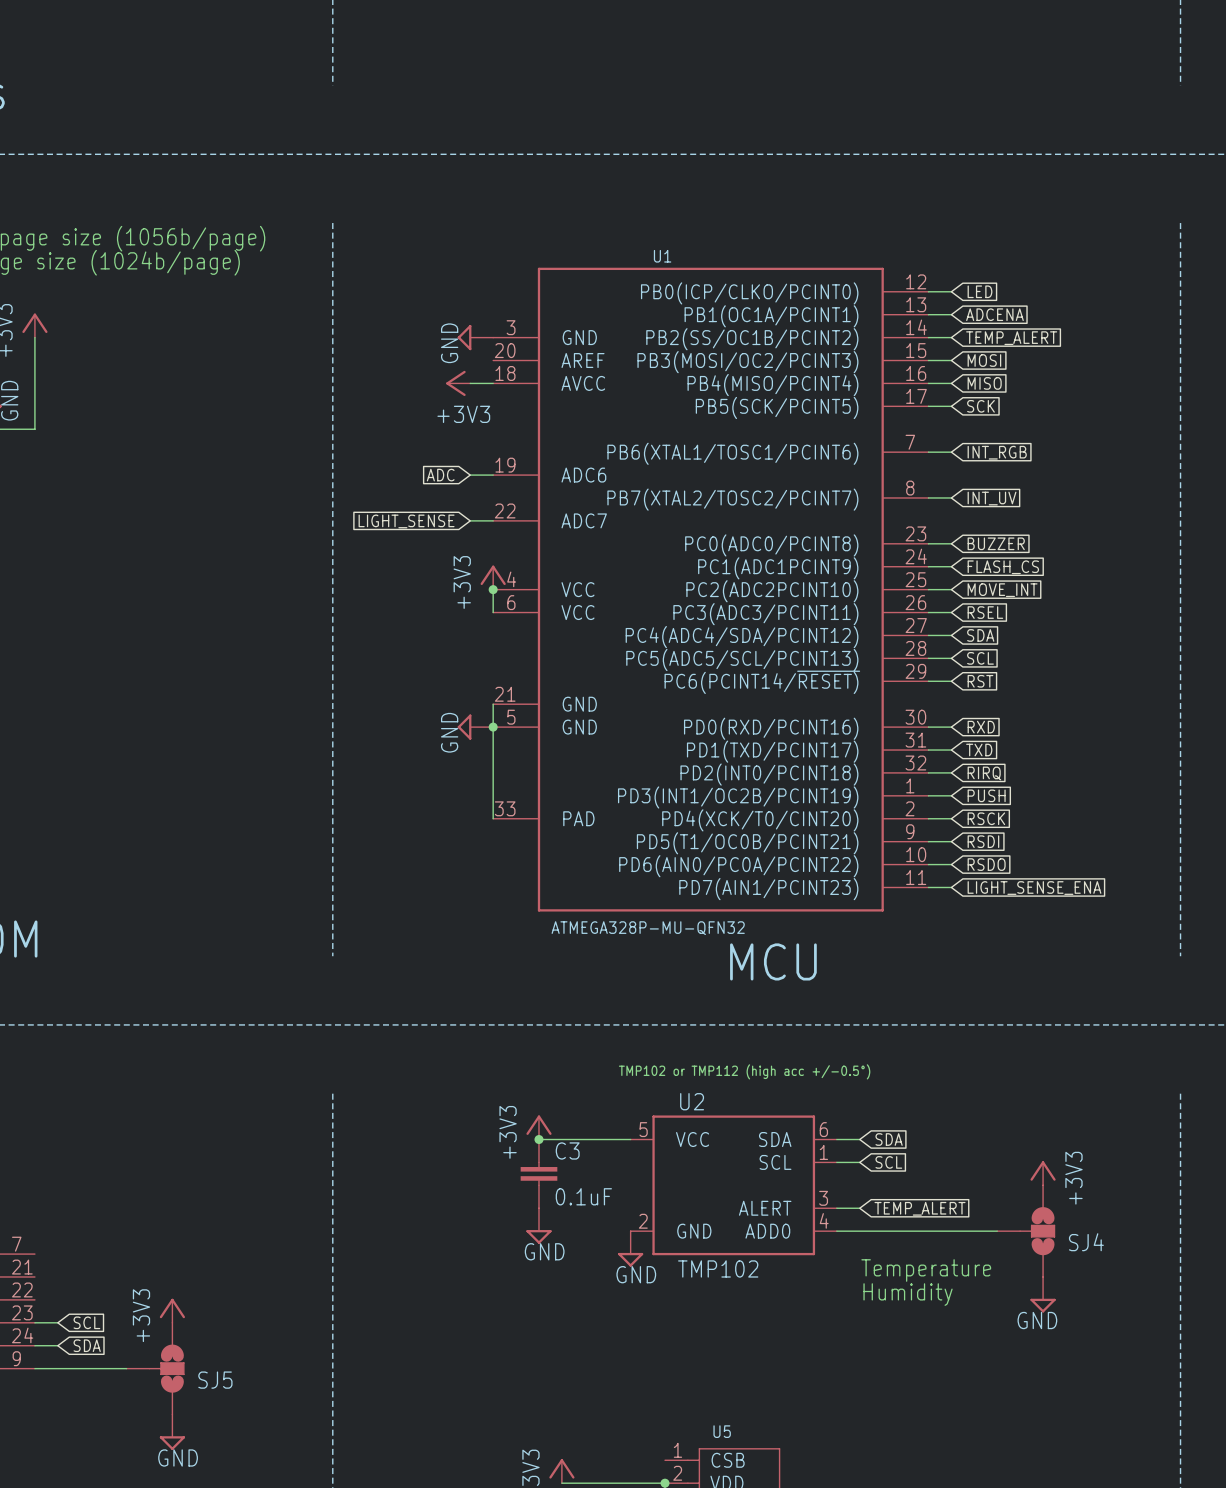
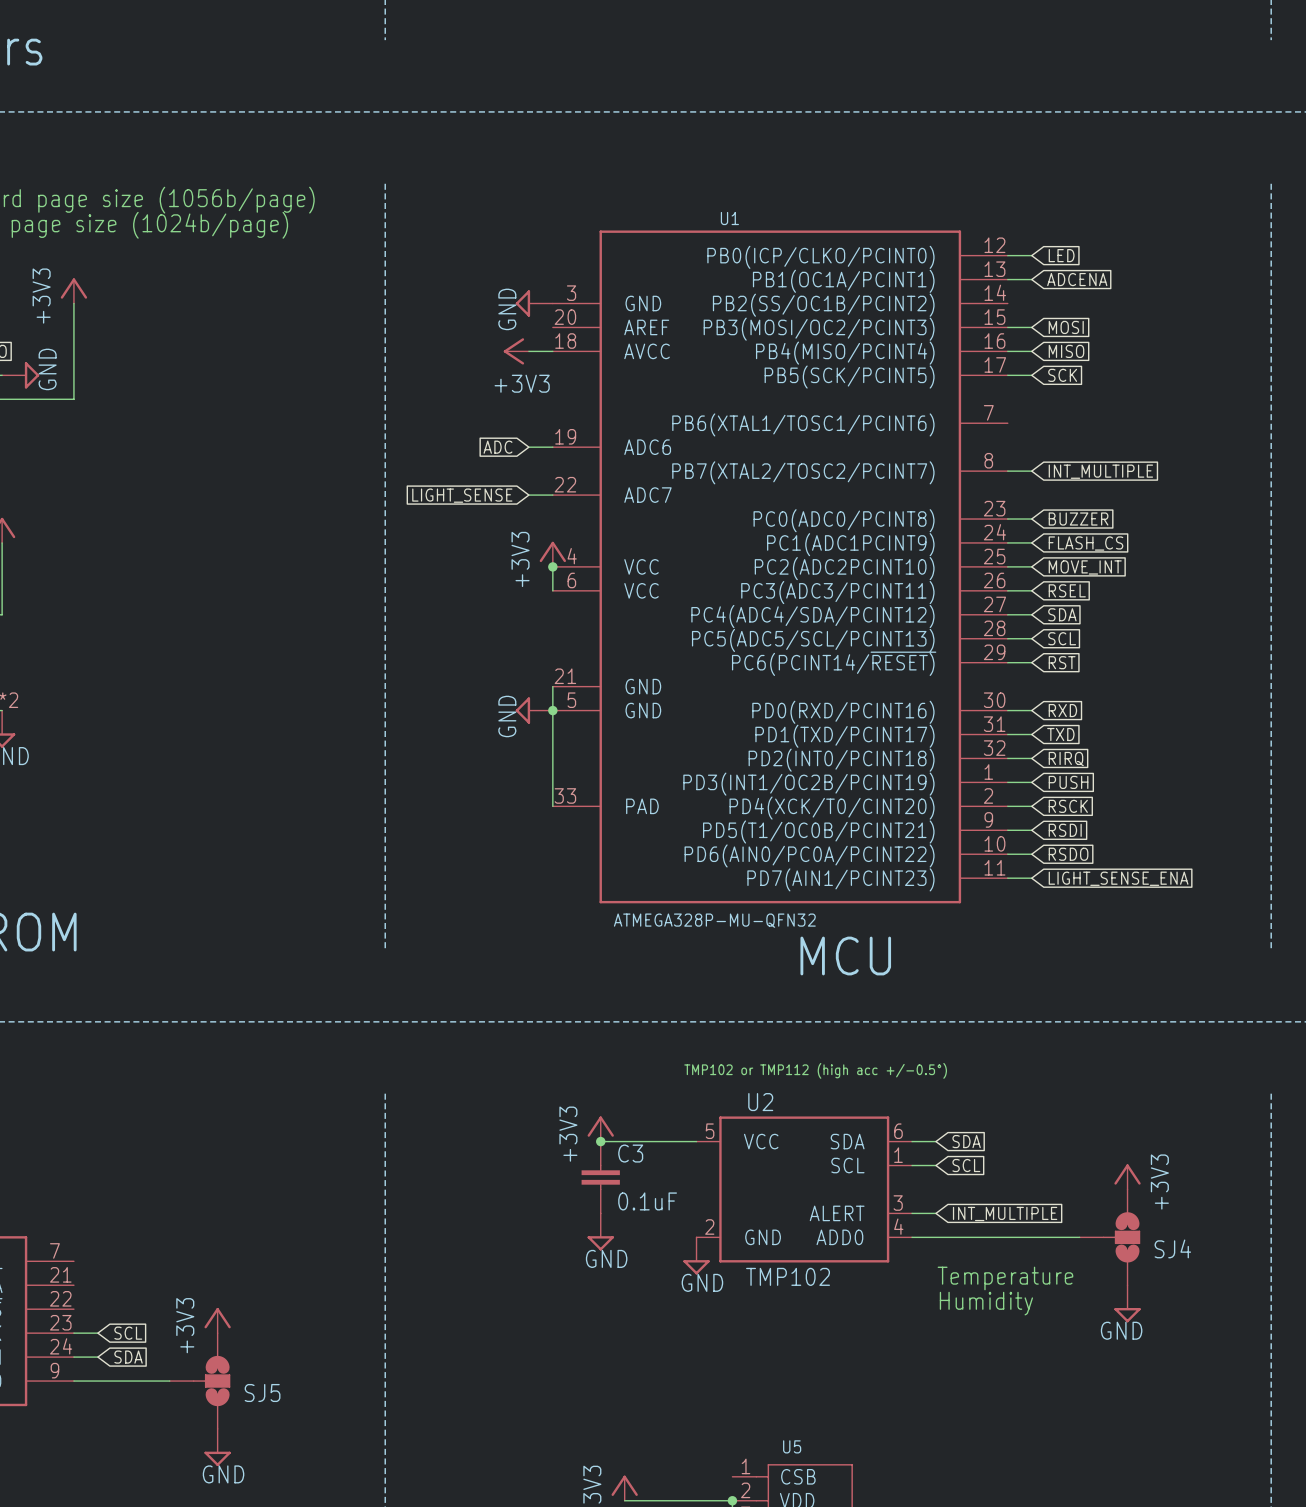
wire: (928, 337) (951, 337) -> none
global label: TEMP_ALERT (1011, 338) -> none
wire: (928, 452) (951, 452) -> none
global label: INT_RGB (997, 452) -> none
global label: INT_UV (992, 498) -> INT_MULTIPLE (1100, 471)
global label: TEMP_ALERT (920, 1208) -> INT_MULTIPLE (1005, 1213)

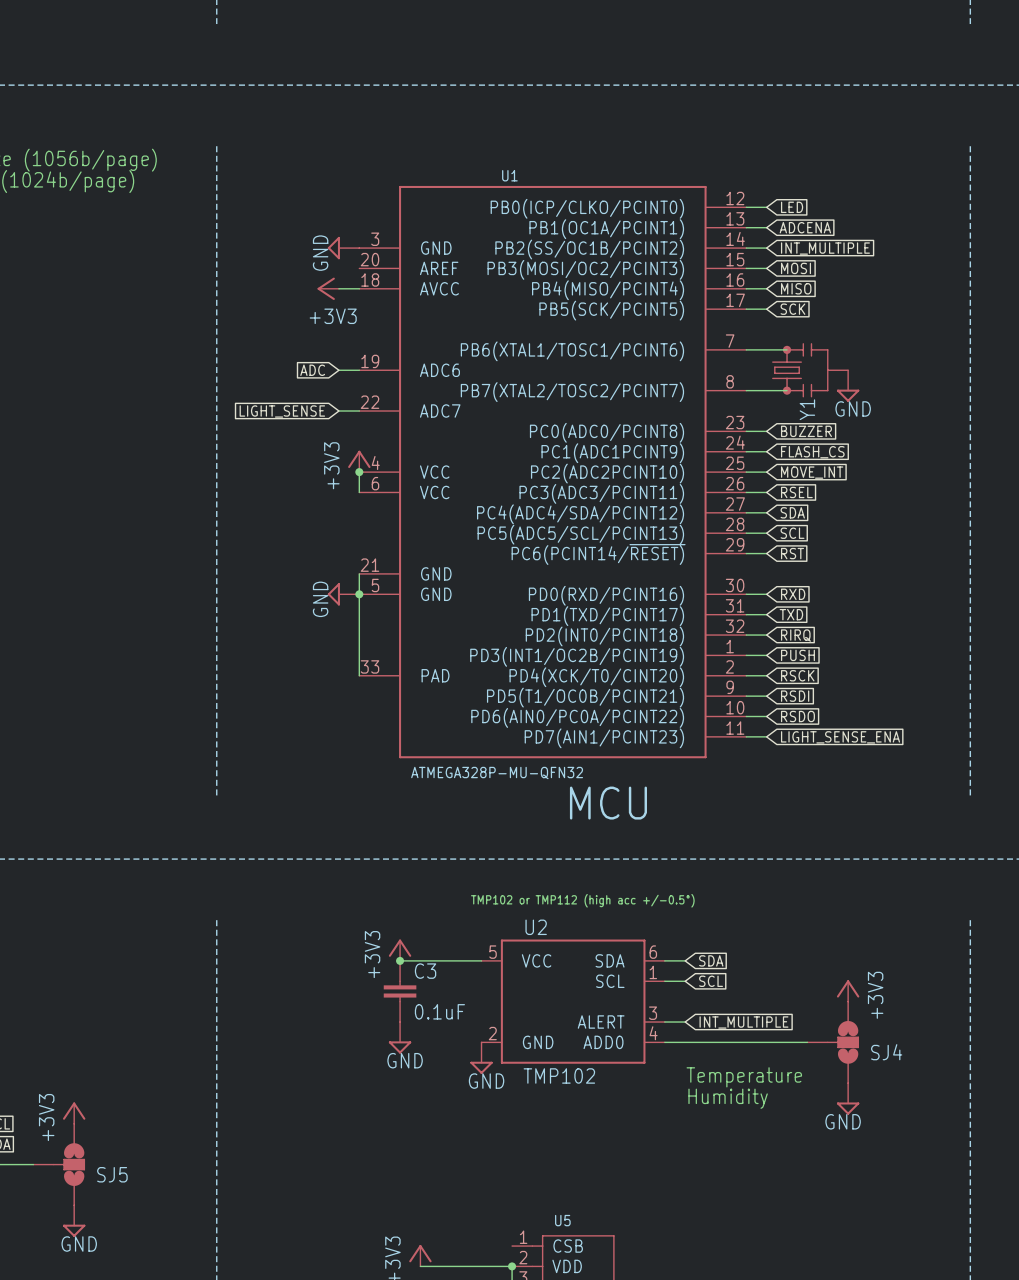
wire: none -> (746, 248) (766, 248)
wire: none -> (746, 349) (787, 349)
Y1: none -> (810, 370)
power symbol: none -> GND (848, 386)
wire: none -> (766, 390) (787, 390)
global label position: INT_MULTIPLE (1100, 471) -> INT_MULTIPLE (825, 248)

